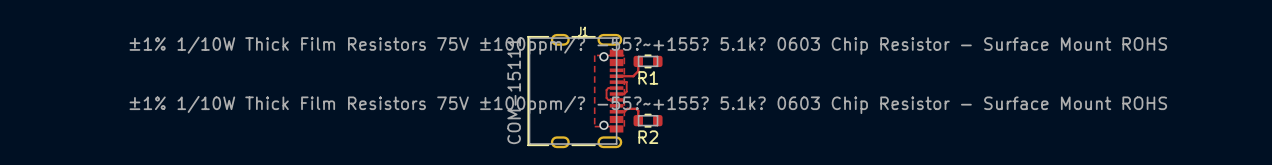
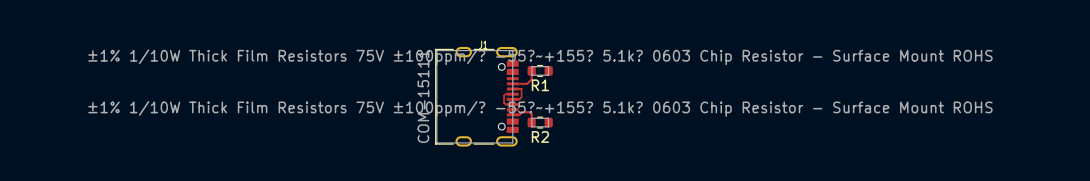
zone outline: (594, 55) (624, 55) (624, 126) (594, 126) (594, 55) -> none

